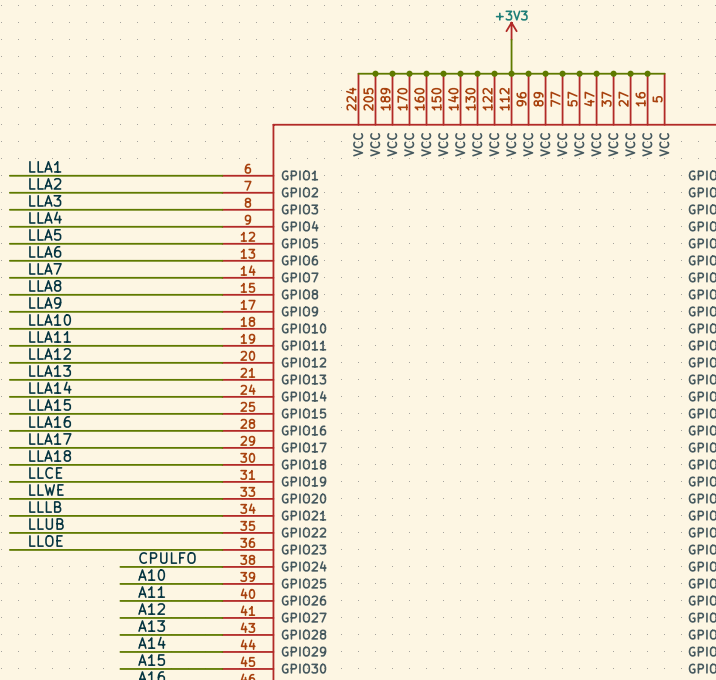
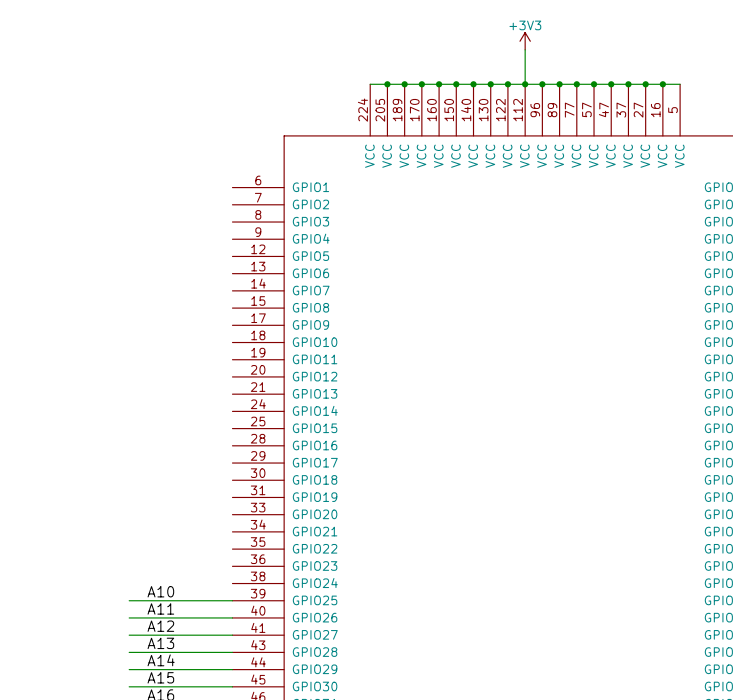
label: LLA1 (45, 166) -> none
wire: (9, 175) (222, 175) -> none
label: LLA2 (45, 183) -> none
wire: (9, 192) (222, 192) -> none
label: LLA3 (45, 200) -> none
wire: (9, 209) (222, 209) -> none
label: LLA4 (45, 217) -> none
wire: (9, 226) (222, 226) -> none
label: LLA5 (45, 234) -> none
wire: (9, 243) (222, 243) -> none
label: LLA6 (45, 251) -> none
wire: (9, 260) (222, 260) -> none
label: LLA7 (45, 268) -> none
wire: (9, 277) (222, 277) -> none
label: LLA8 (45, 285) -> none
wire: (9, 294) (222, 294) -> none
label: LLA9 (45, 302) -> none
wire: (9, 311) (222, 311) -> none
label: LLA10 (50, 319) -> none
wire: (9, 328) (222, 328) -> none
label: LLA11 (50, 336) -> none
wire: (9, 345) (222, 345) -> none
label: LLA12 (50, 353) -> none
wire: (9, 362) (222, 362) -> none
label: LLA13 (50, 370) -> none
wire: (9, 379) (222, 379) -> none
label: LLA14 (50, 387) -> none
wire: (9, 396) (222, 396) -> none
label: LLA15 (50, 404) -> none
wire: (9, 413) (222, 413) -> none
label: LLA16 (50, 421) -> none
wire: (9, 430) (222, 430) -> none
label: LLA17 (50, 438) -> none
wire: (9, 447) (222, 447) -> none
label: LLA18 (50, 455) -> none
wire: (9, 464) (222, 464) -> none
label: LLCE (45, 472) -> none
wire: (9, 481) (222, 481) -> none
label: LLWE (46, 489) -> none
wire: (9, 498) (222, 498) -> none
label: LLLB (45, 507) -> none
wire: (9, 515) (222, 515) -> none
label: LLUB (46, 524) -> none
wire: (9, 532) (222, 532) -> none
label: LLOE (45, 541) -> none
wire: (9, 549) (222, 549) -> none
label: CPULFO (167, 558) -> none
wire: (120, 566) (222, 566) -> none

